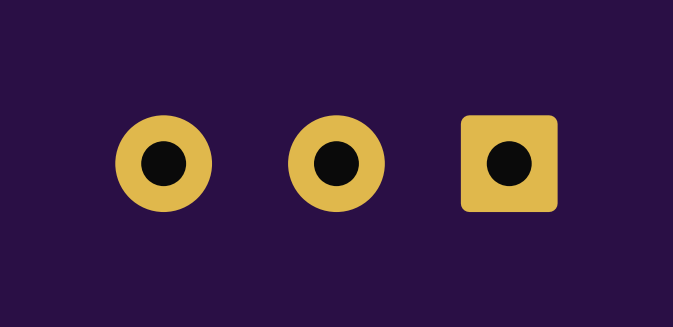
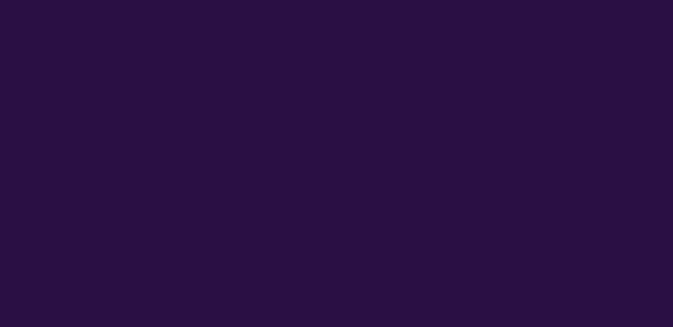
part: (336, 163) -> none

